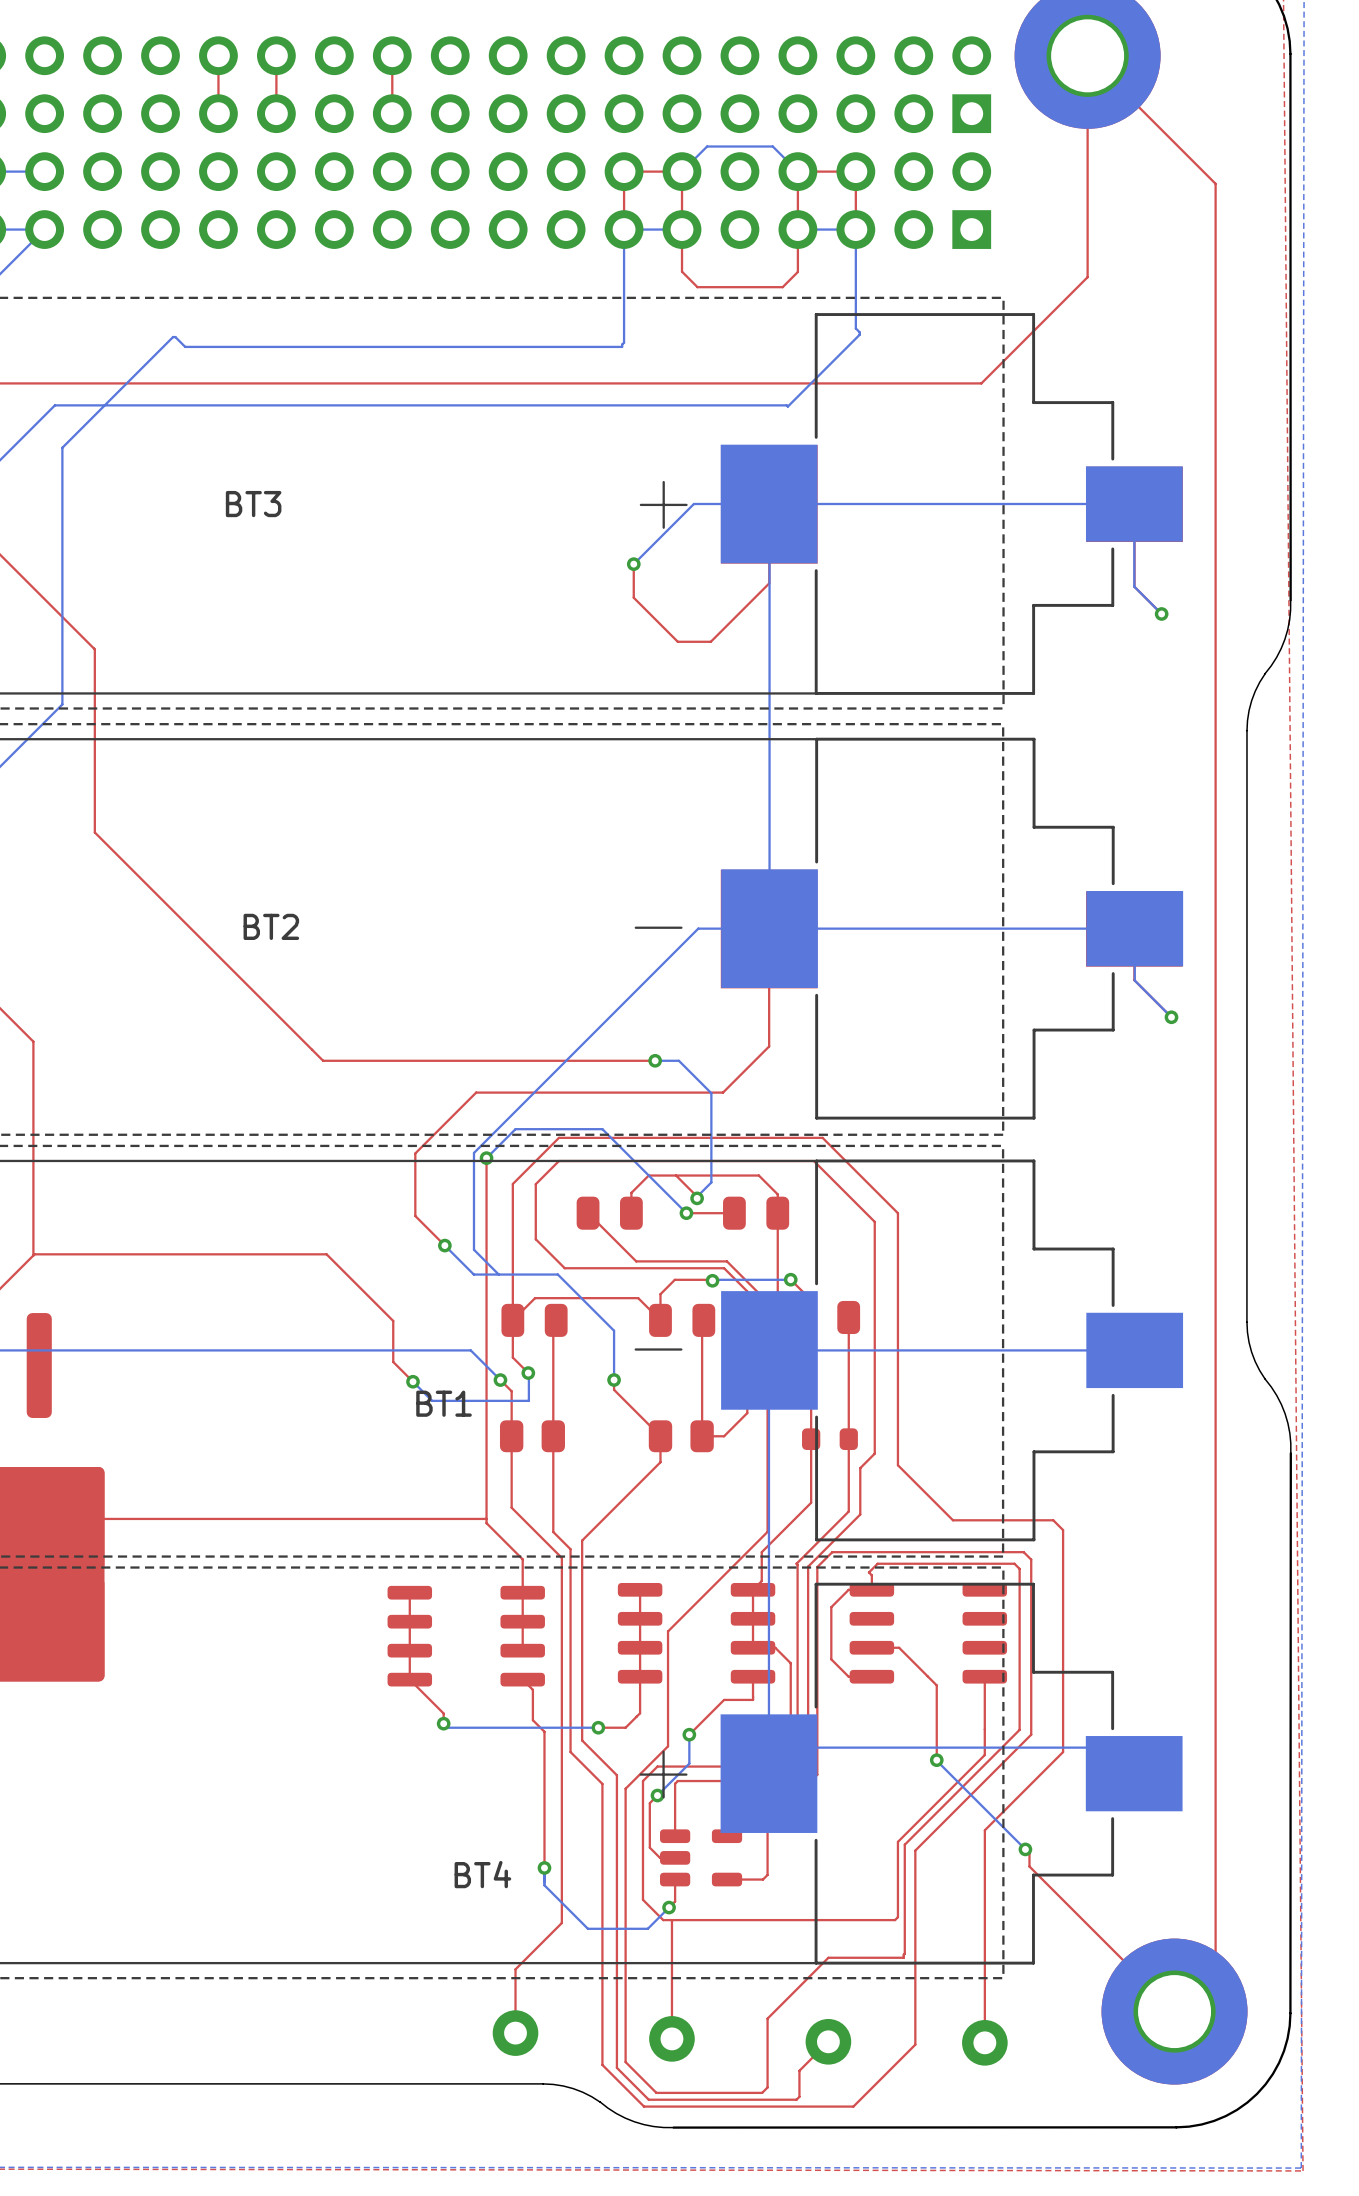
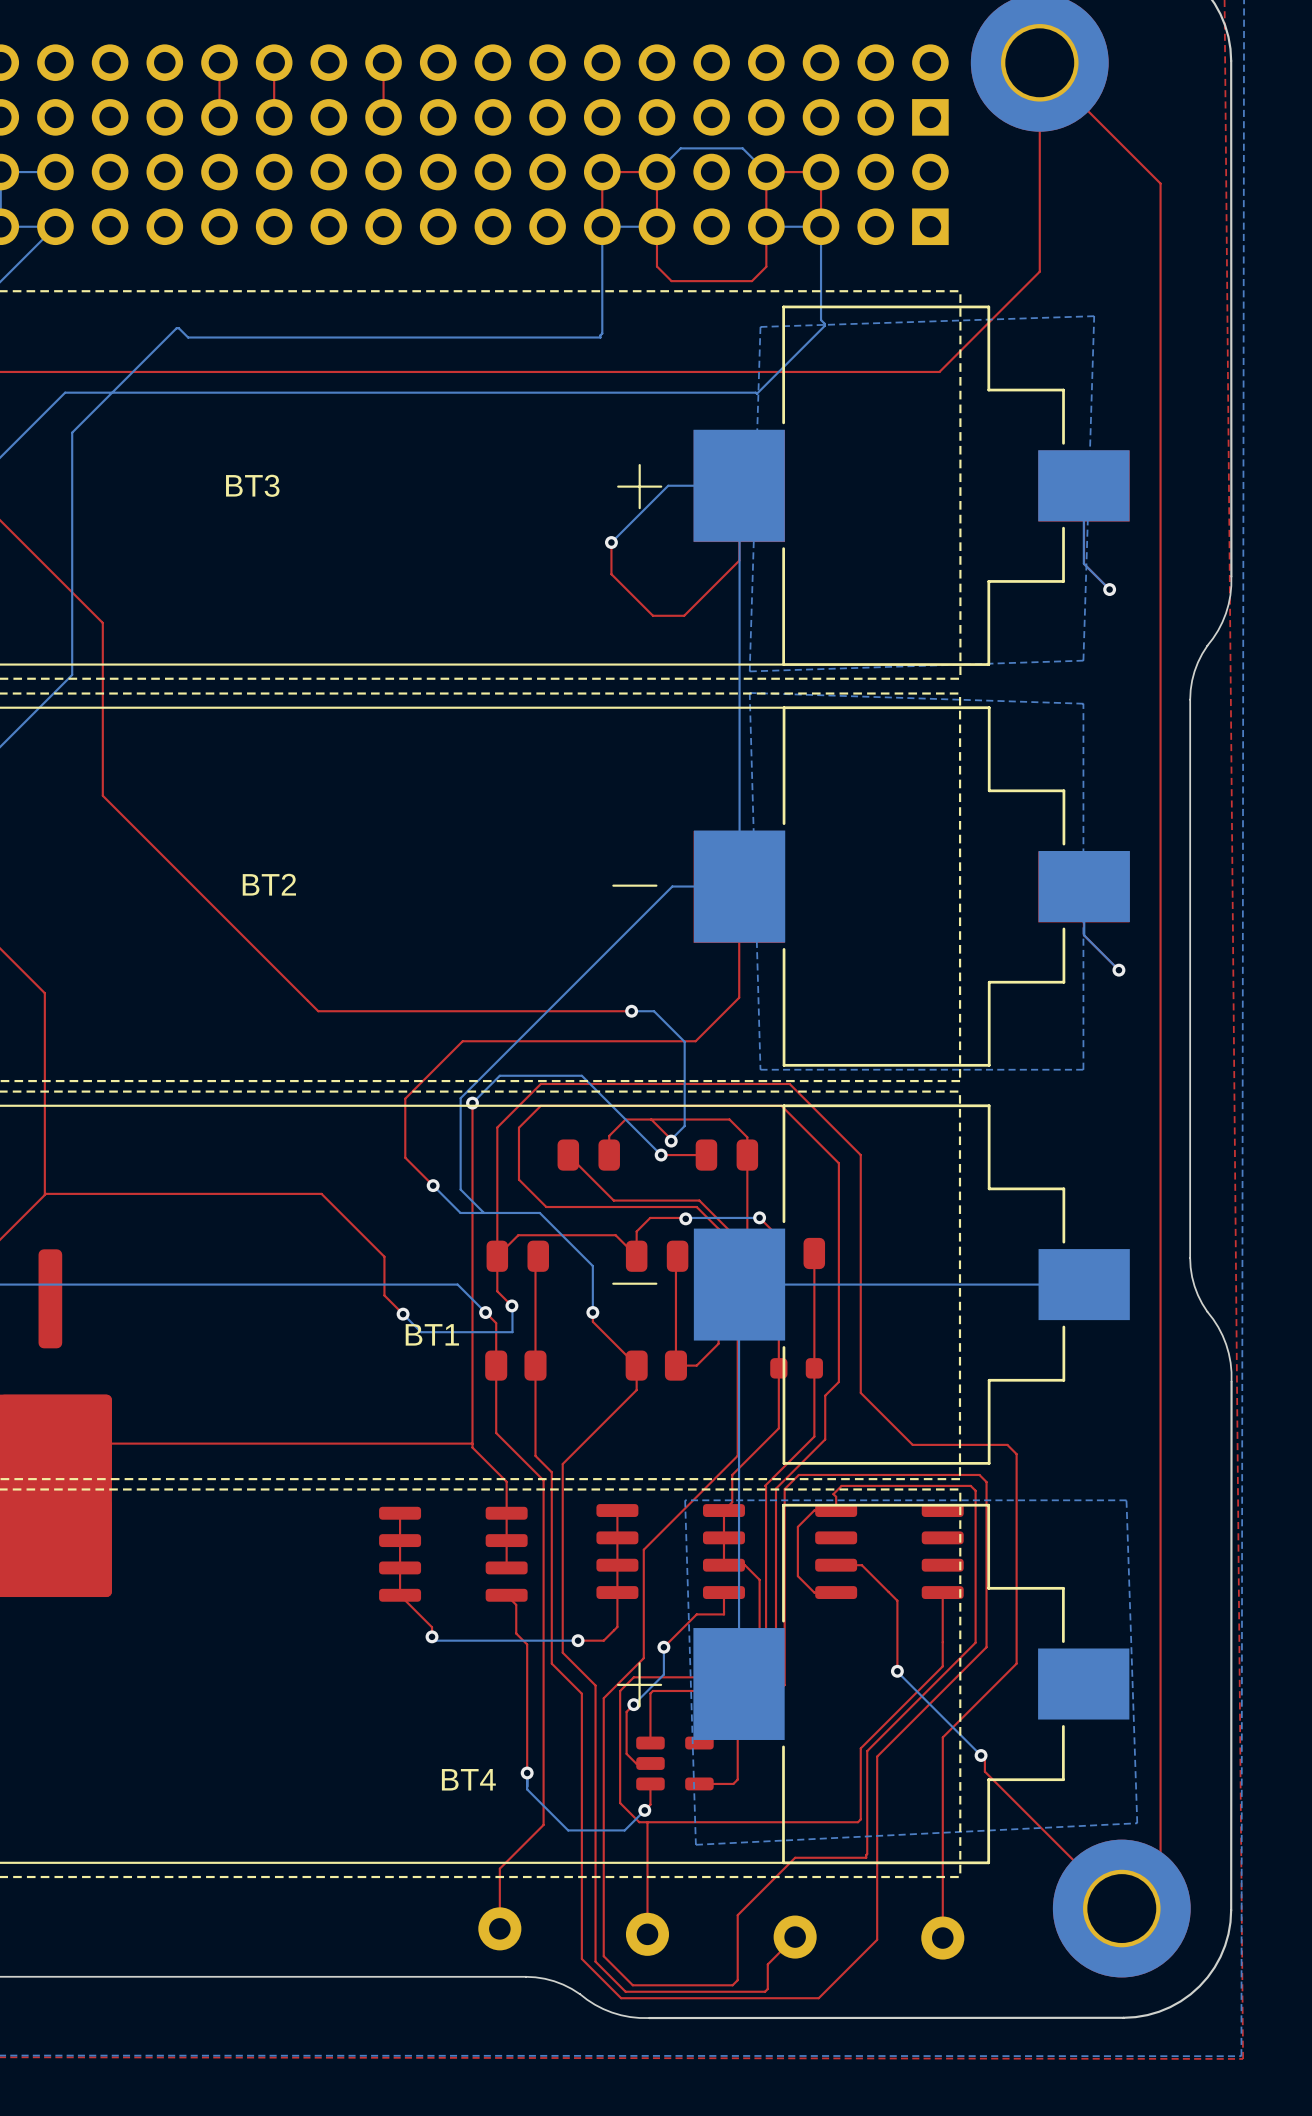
bottom zone outline: none -> (1094, 316) (760, 326) (749, 671) (1083, 660) (1094, 316)
bottom track: (1134, 503) (769, 503) -> none
bottom zone outline: none -> (749, 692) (1083, 703) (1083, 1069) (760, 1069) (749, 692)
bottom track: (1134, 928) (769, 928) -> none
bottom zone outline: none -> (1126, 1500) (685, 1500) (695, 1844) (1137, 1823) (1126, 1500)
bottom track: (1108, 1747) (794, 1747) -> none

